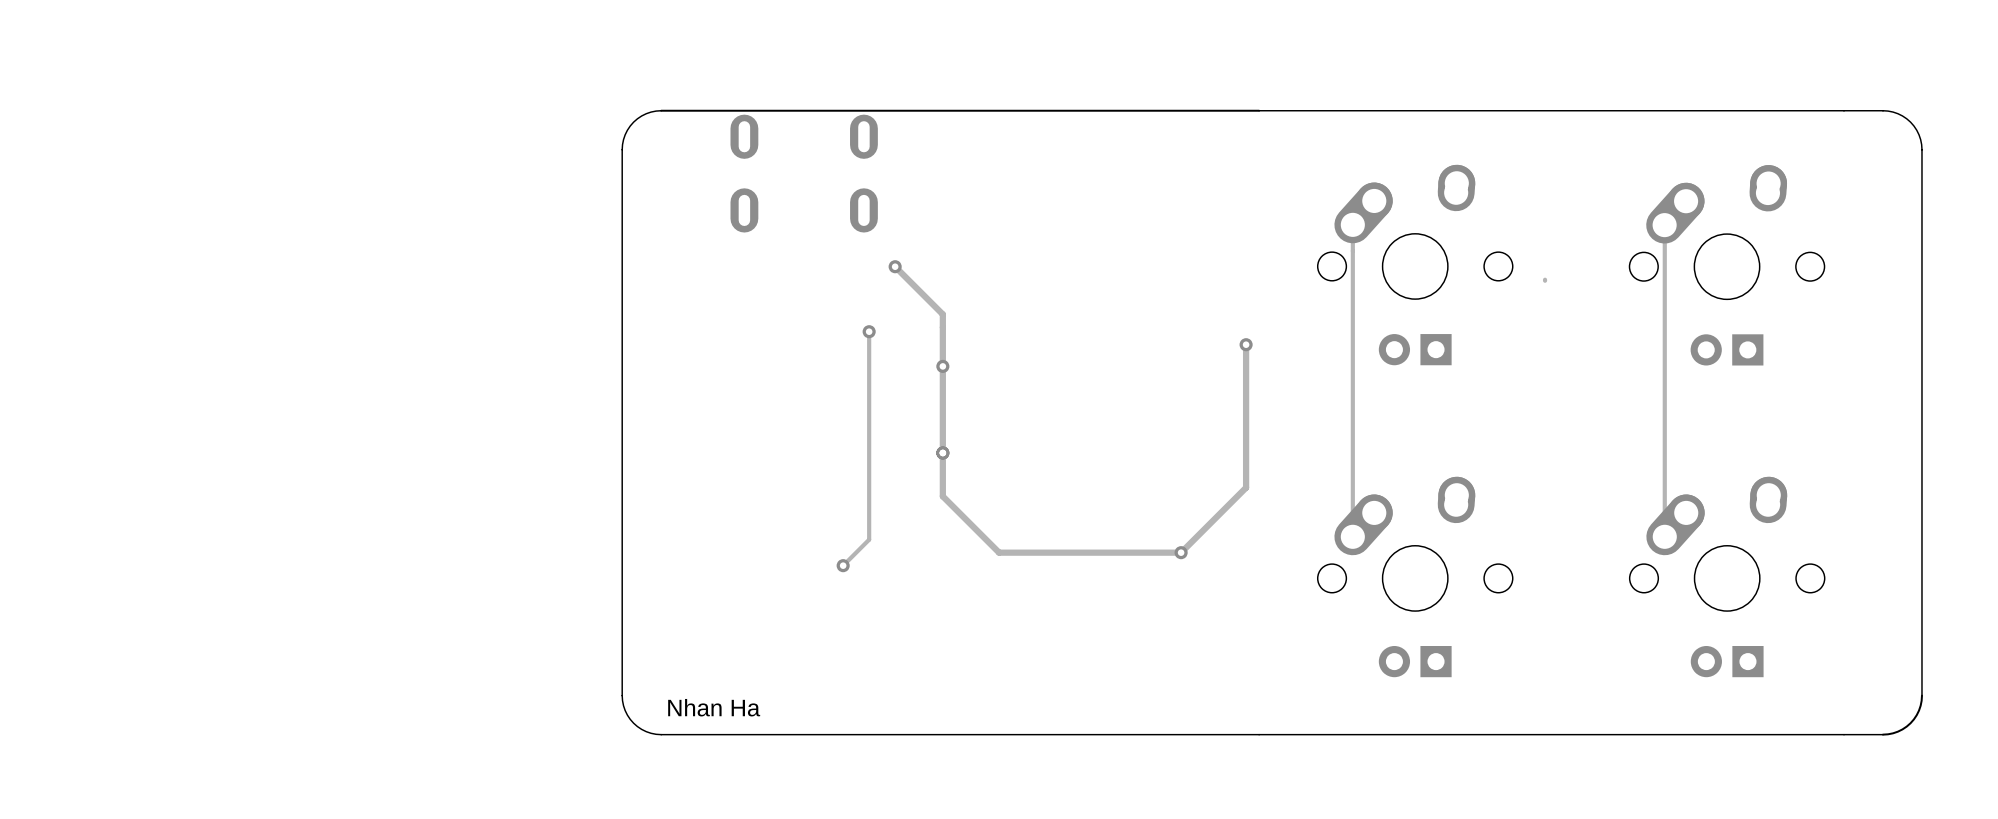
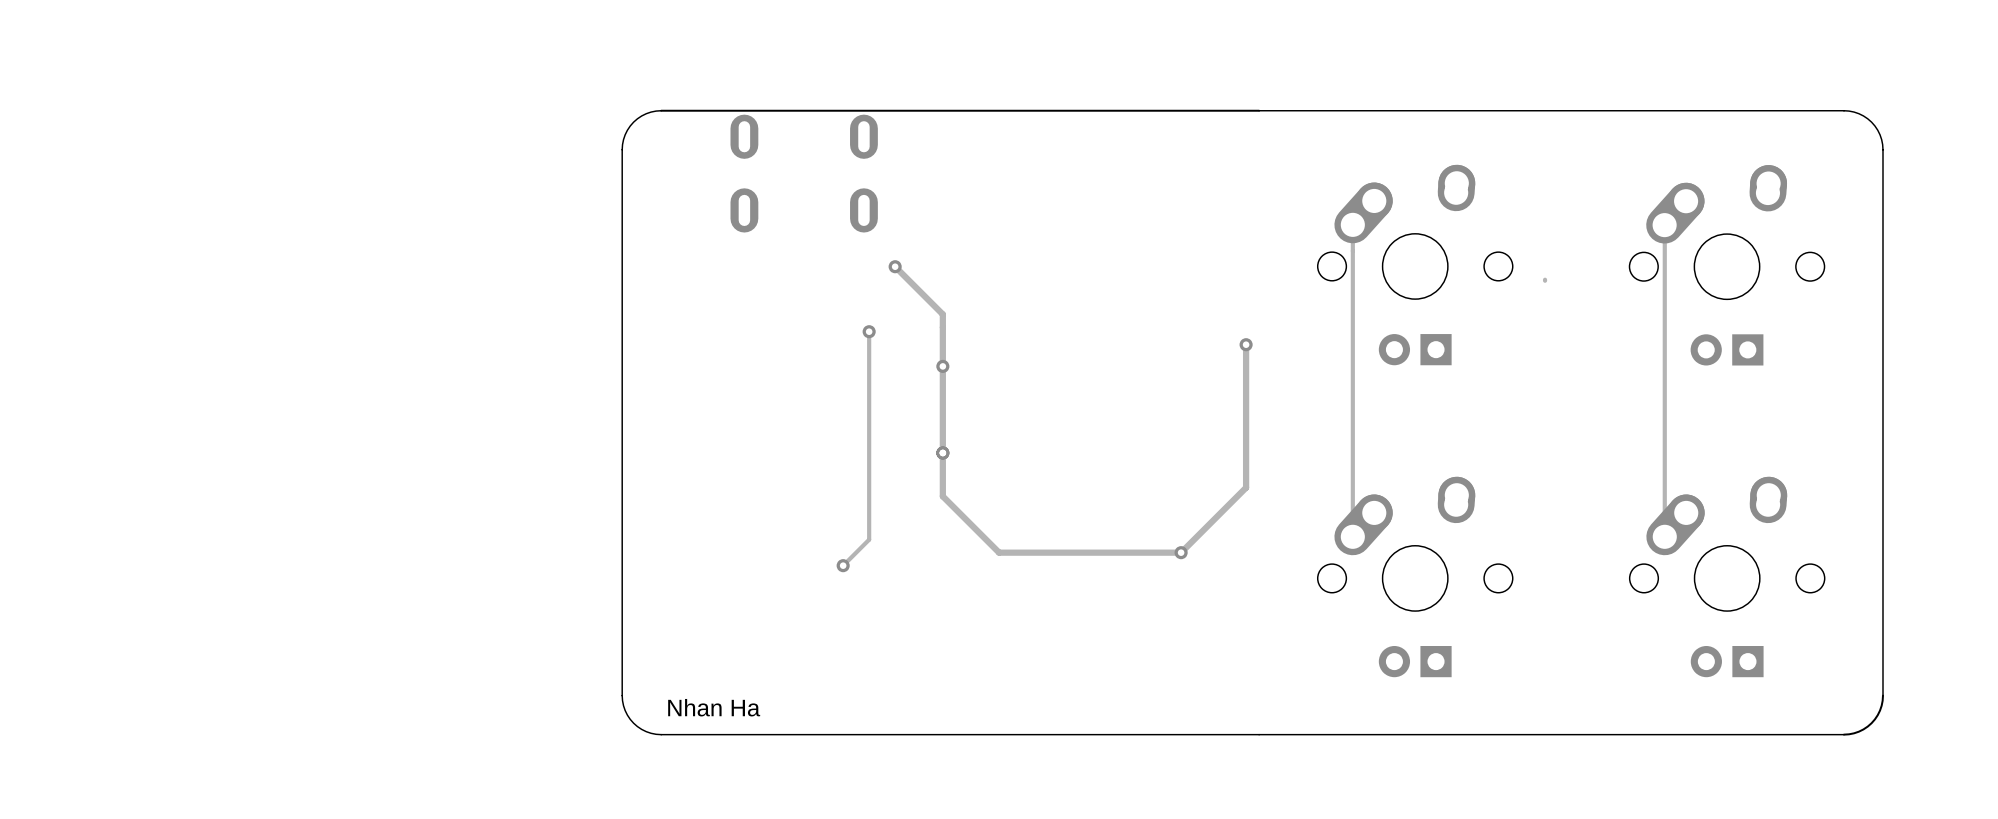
board edge: (1844, 110) (1888, 111) (1902, 115) (1916, 130) (1921, 149) (1921, 700) (1913, 719) (1897, 731) (1882, 734) (1844, 734) -> (1844, 110) (1858, 113) (1871, 122) (1880, 134) (1882, 149) (1882, 700) (1877, 715) (1867, 726) (1858, 731) (1844, 734)

